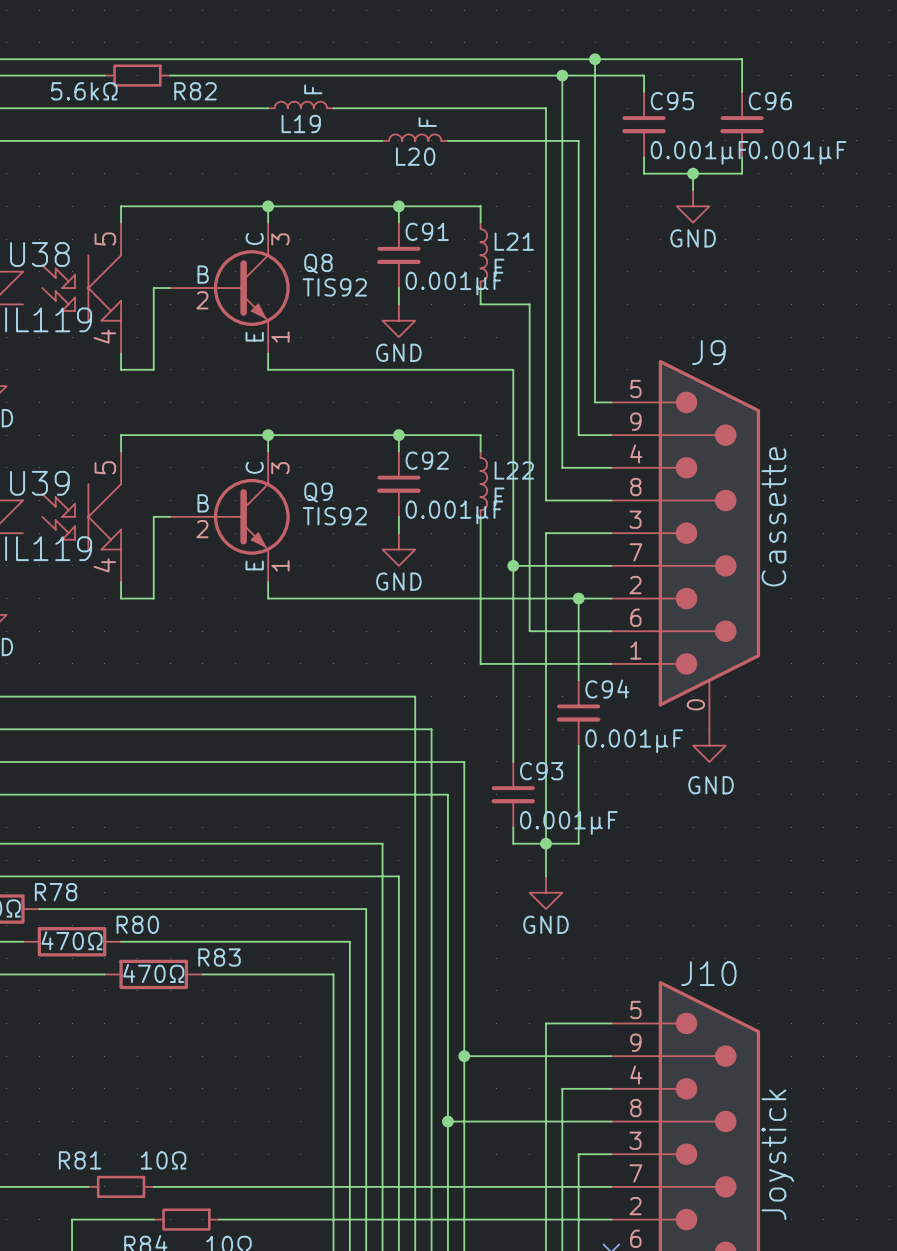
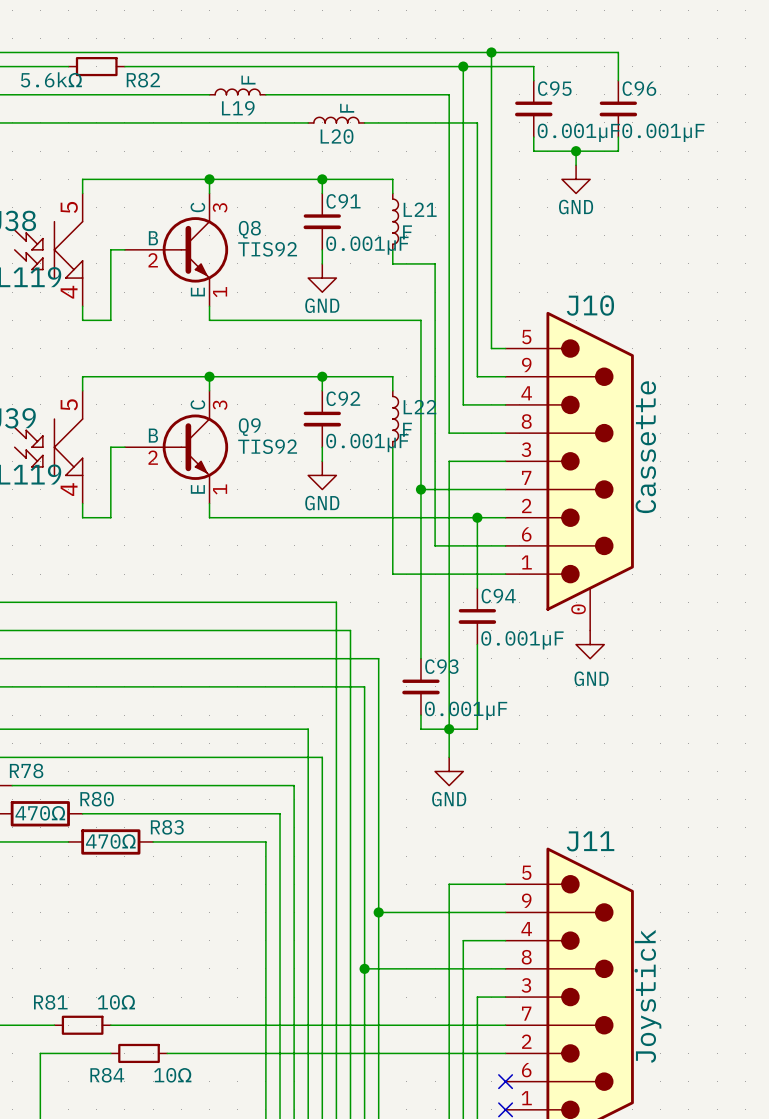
J9 name: J9 (708, 352) -> J10 (590, 305)
J10 name: J10 (708, 973) -> J11 (590, 841)

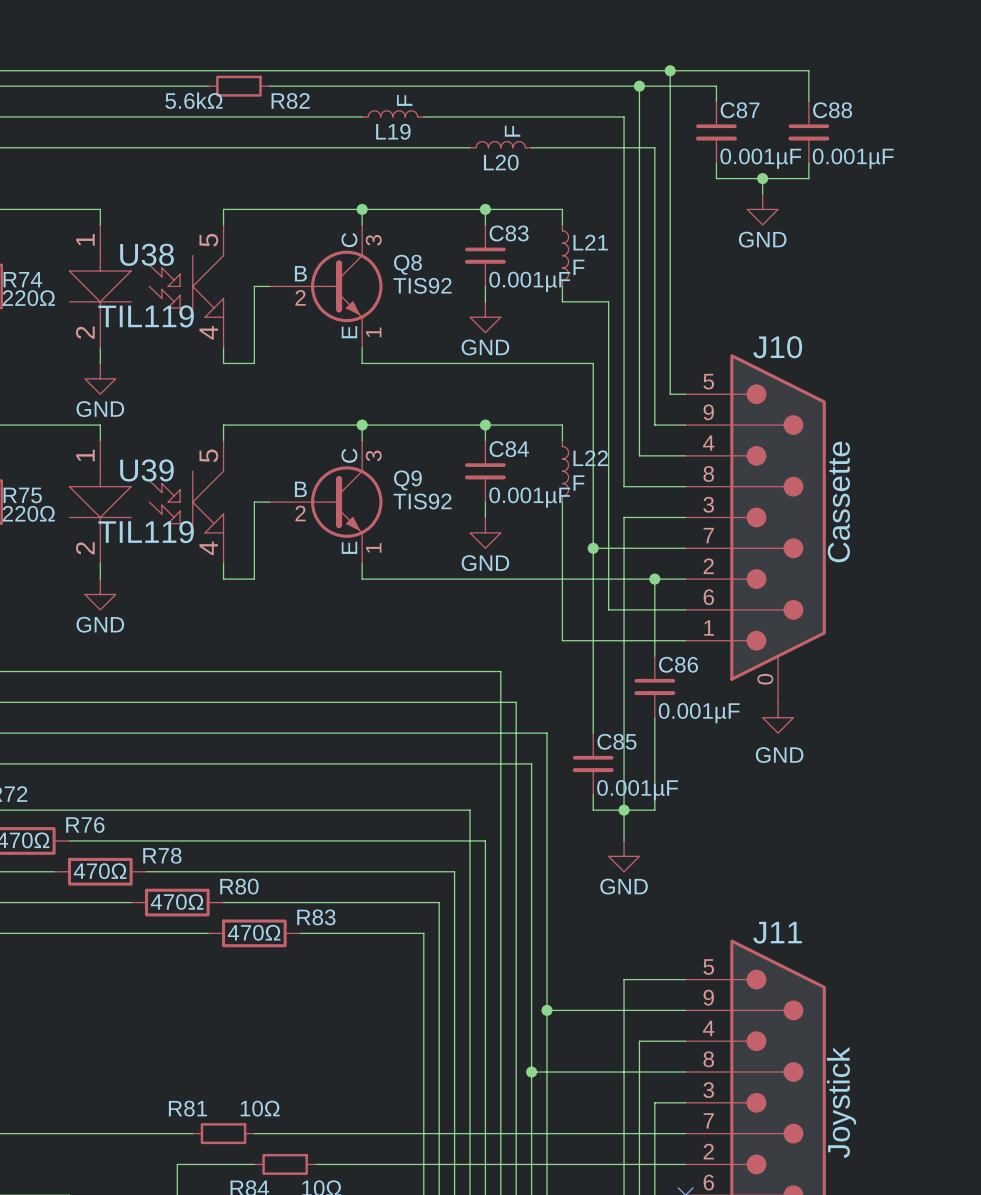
C95 name: C95 (554, 88) -> C87 (740, 110)
C96 name: C96 (639, 88) -> C88 (832, 110)
C91 name: C91 (343, 201) -> C83 (509, 233)
C92 name: C92 (343, 398) -> C84 (509, 449)
C94 name: C94 (498, 596) -> C86 (678, 664)
C93 name: C93 (441, 666) -> C85 (616, 741)

